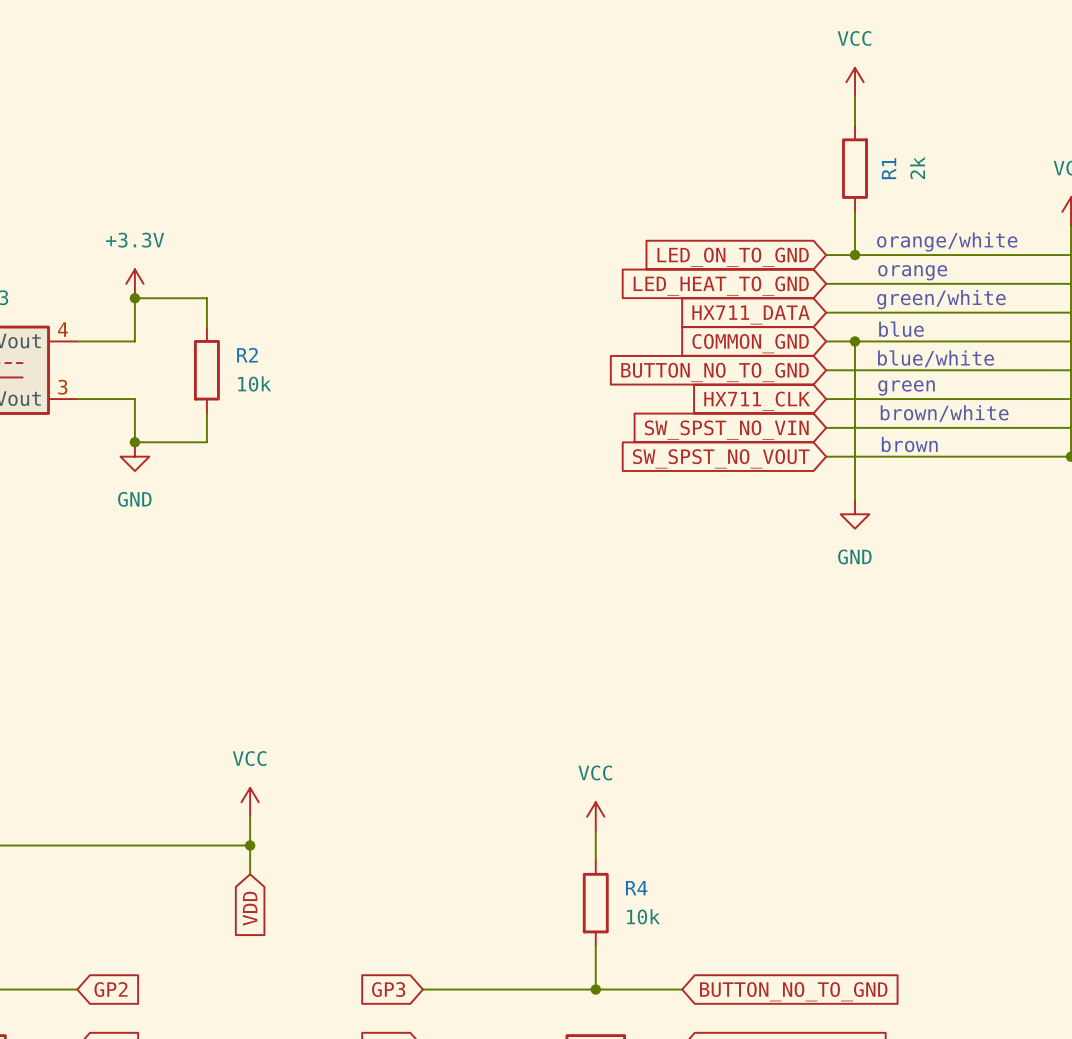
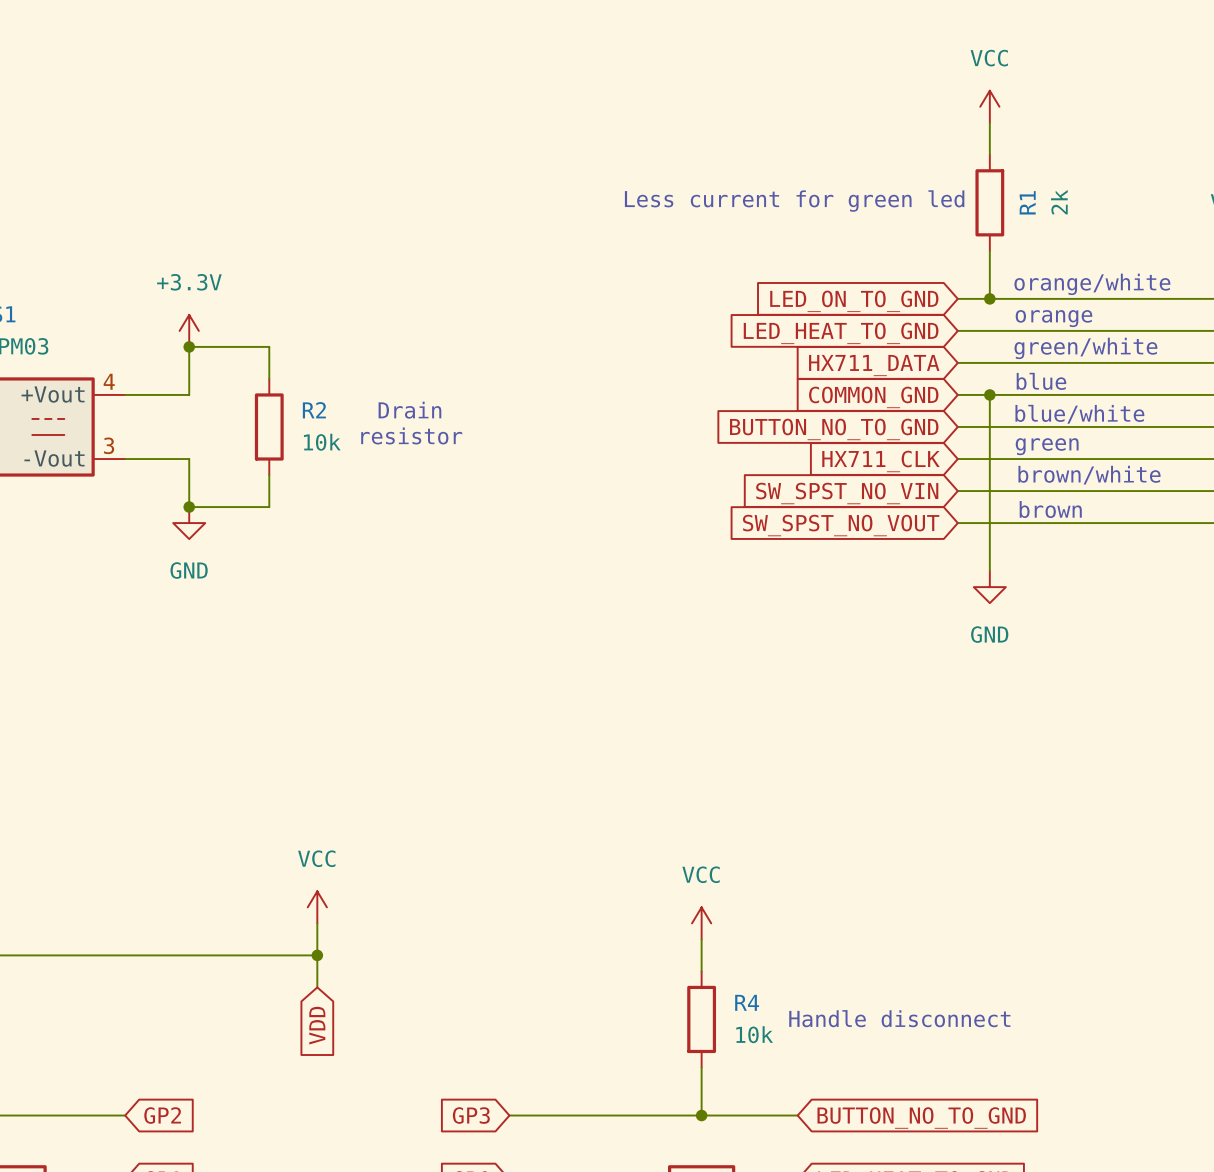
text: none -> Less current for green led (794, 201)
text: none -> Drain (409, 410)
text: none -> resistor (411, 435)
text: none -> Handle disconnect (899, 1018)

